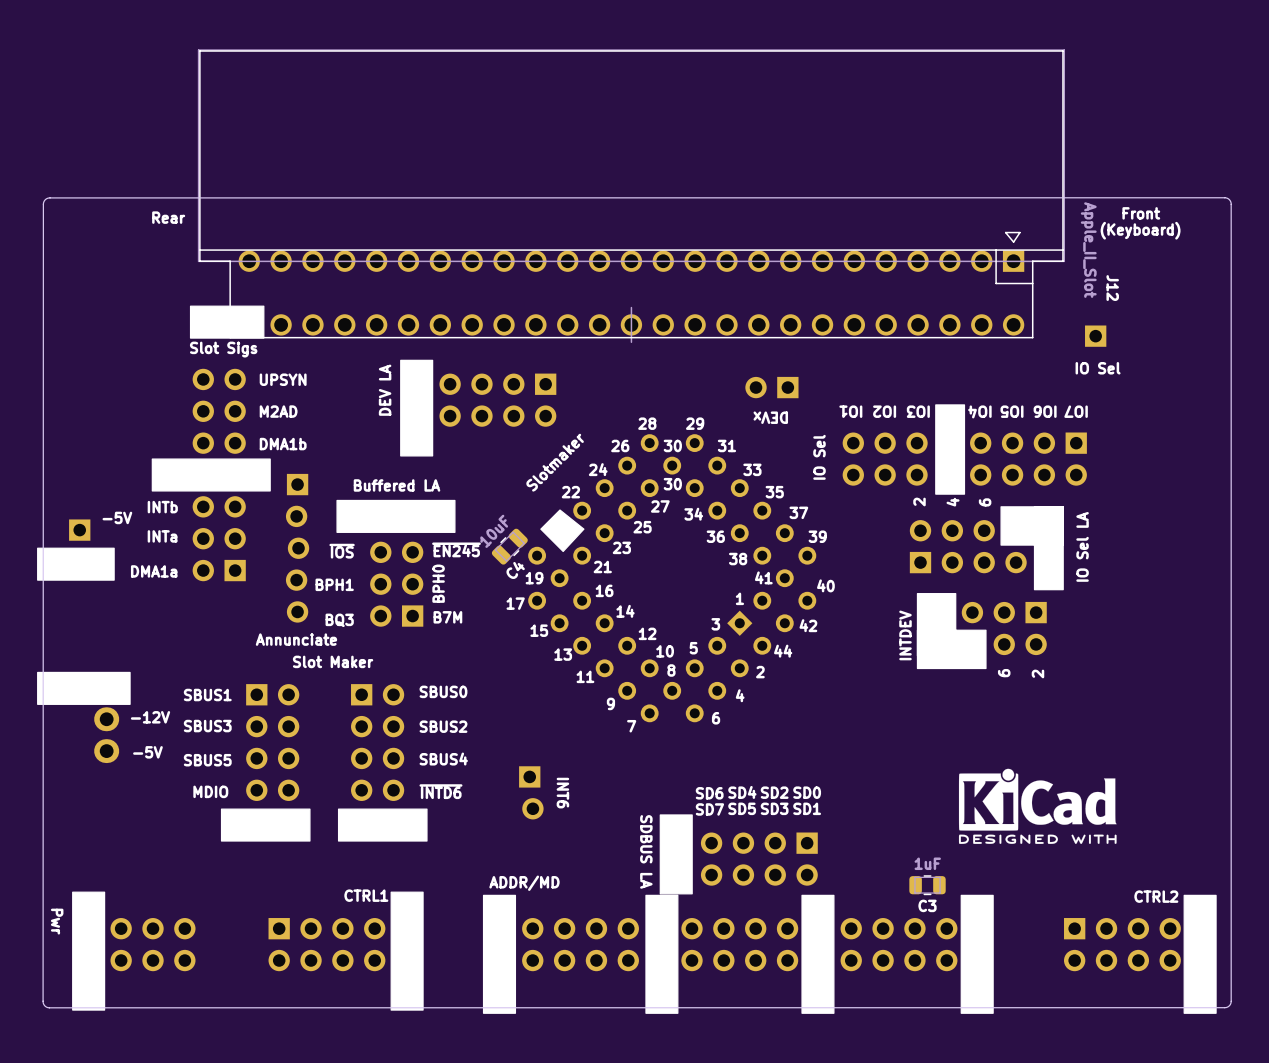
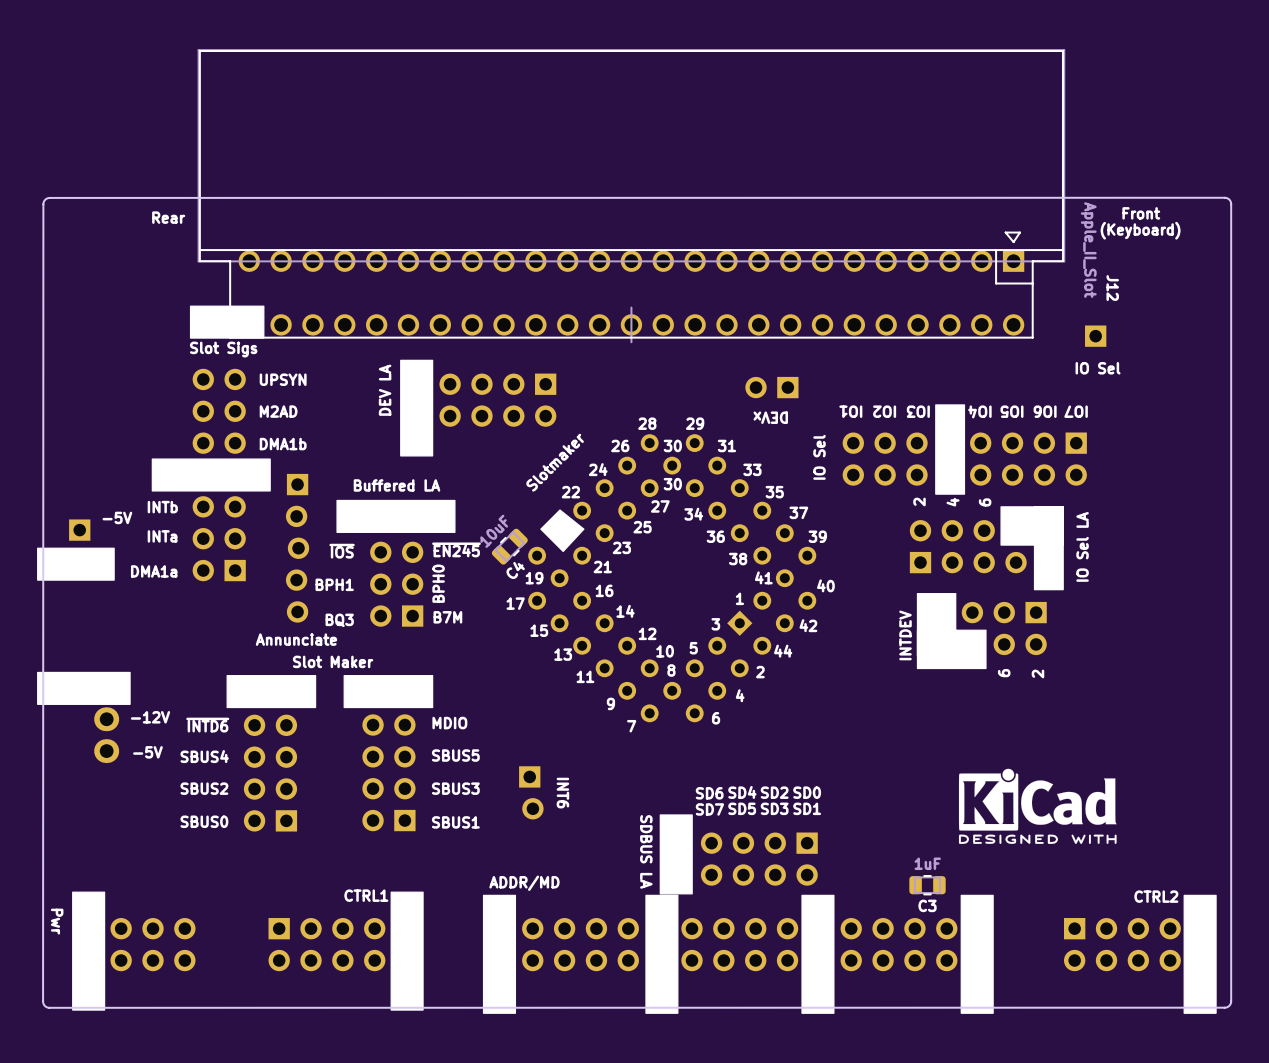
drawing: none -> [226, 675, 317, 709]
drawing: none -> [343, 675, 434, 709]
text position: SBUS0 (443, 691) -> SBUS0 (204, 821)
text position: SBUS1 (207, 695) -> SBUS1 (455, 822)
text: SBUS3 (207, 726) -> ~{INTD6} (207, 725)
text position: SBUS2 (443, 726) -> SBUS2 (204, 788)
part rotation: 0° (272, 758) -> 180° (270, 757)
part rotation: 0° (377, 758) -> 180° (388, 756)
text position: SBUS4 (443, 759) -> SBUS4 (204, 756)
text position: SBUS5 (207, 760) -> SBUS5 (455, 755)
text: none -> SBUS3 (455, 788)
text position: MDIO (210, 791) -> MDIO (449, 723)
text: ~{INTD6} (440, 791) -> none
drawing: [220, 808, 311, 842] -> none
drawing: [337, 808, 428, 842] -> none

